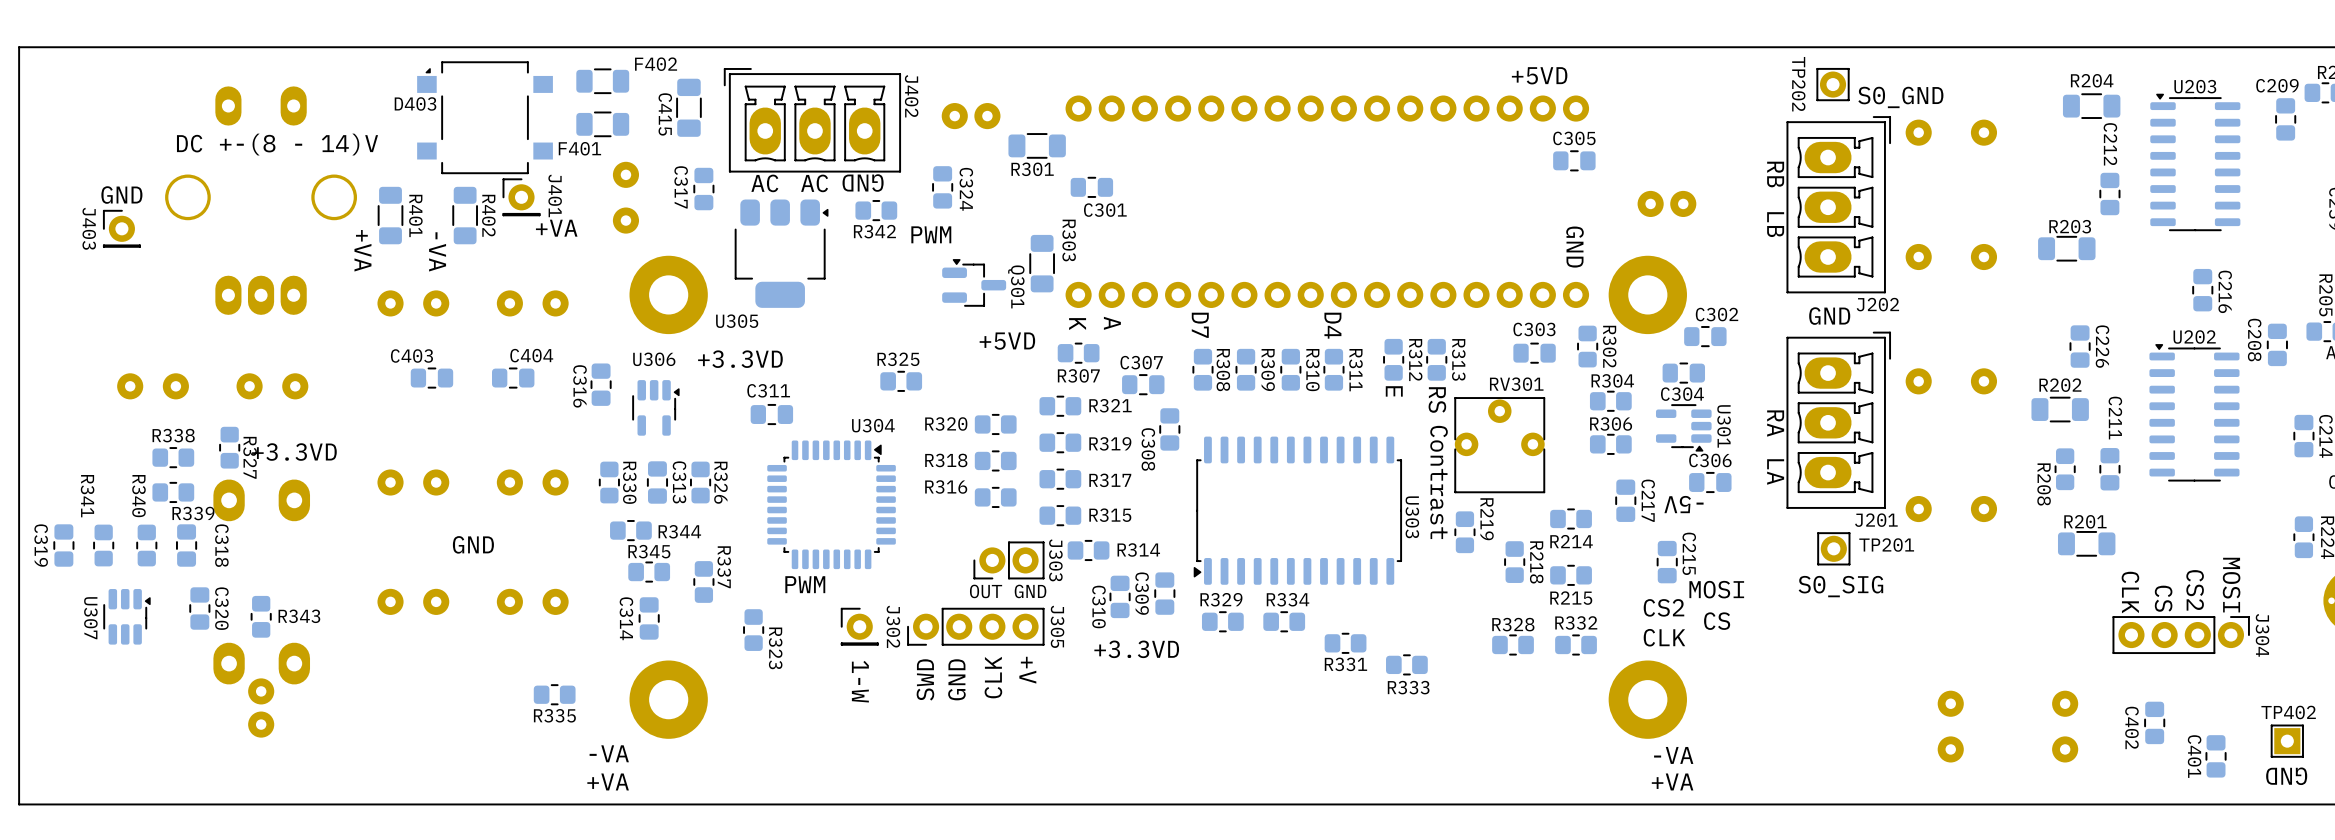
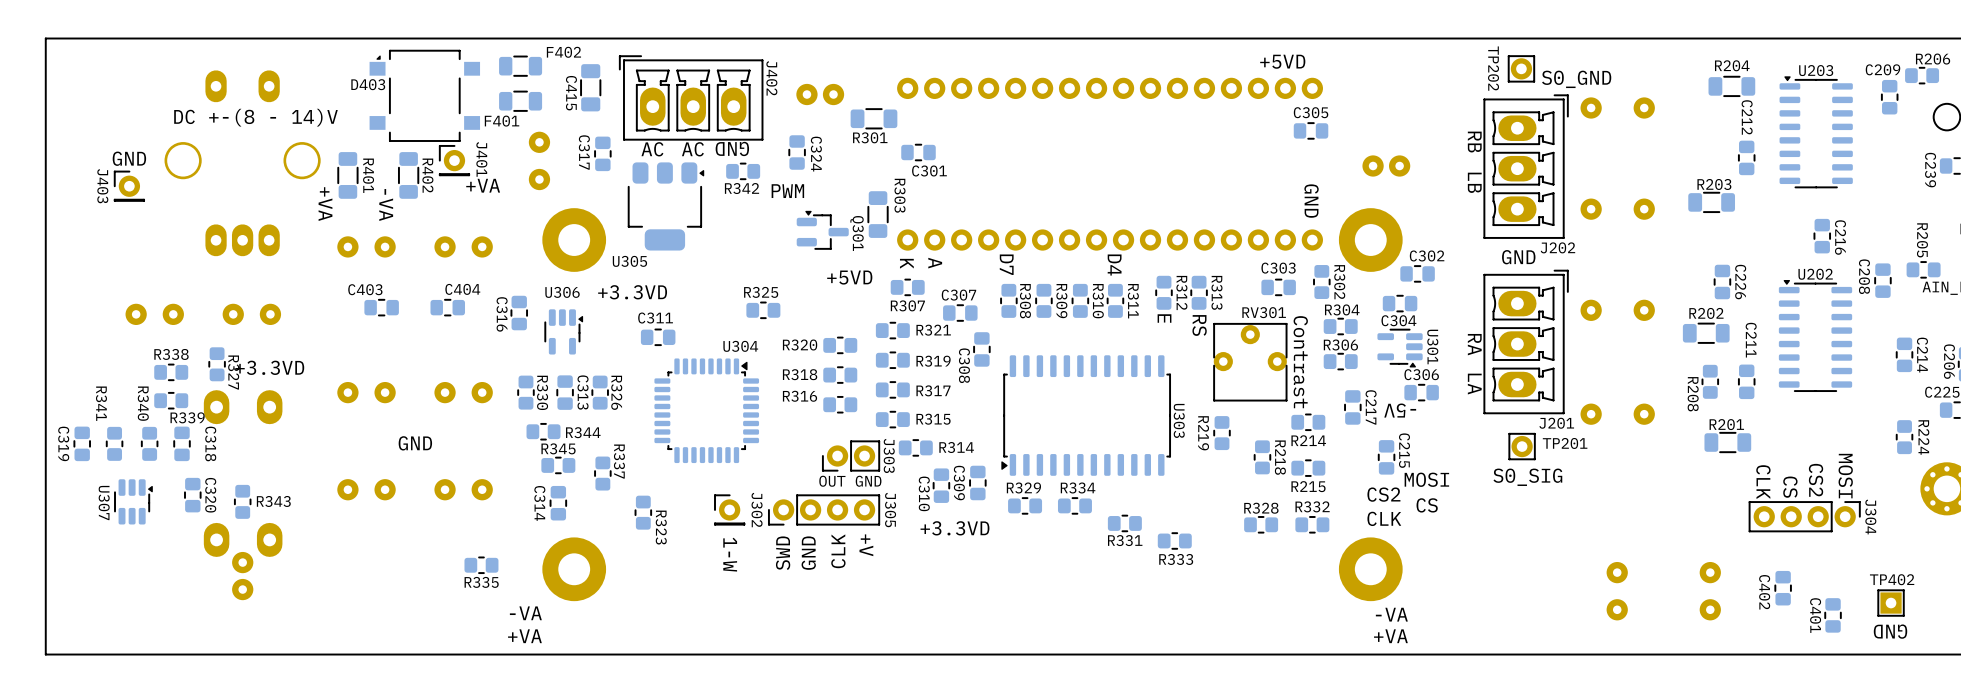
text position: Contrast (1439, 482) -> Contrast (1300, 362)
R219 name position: R219 (1487, 519) -> R219 (1203, 433)
text: PWM (805, 584) -> none

